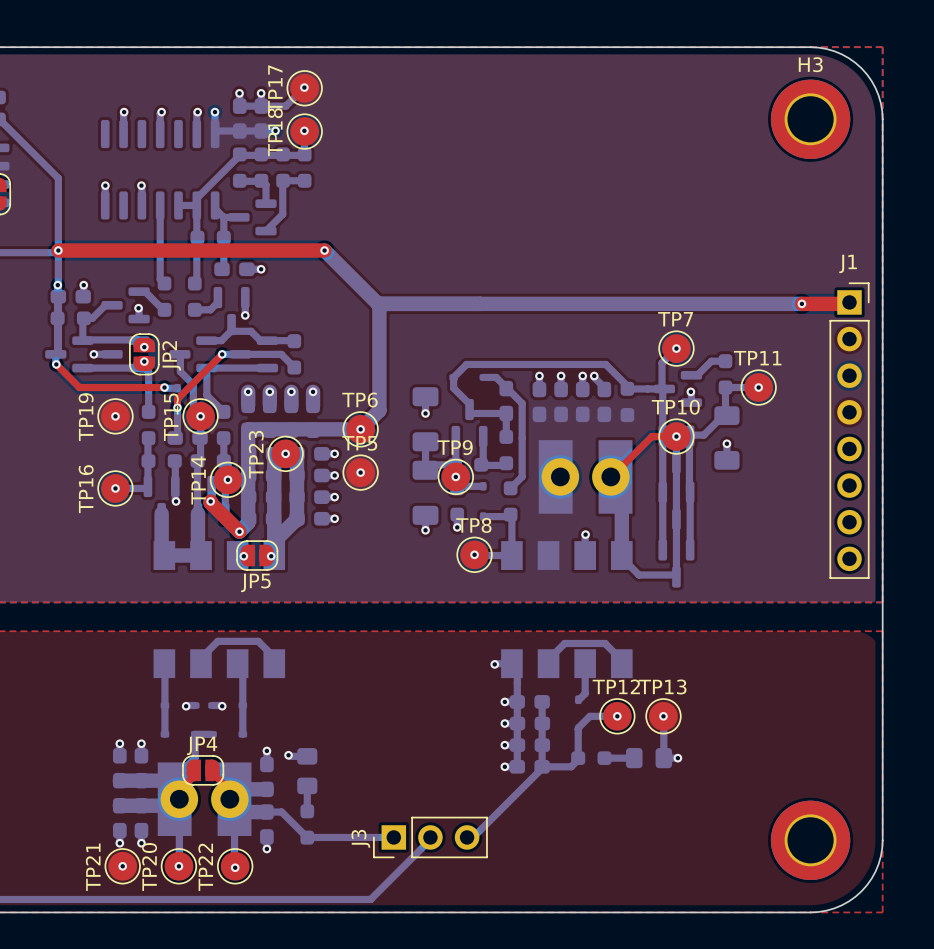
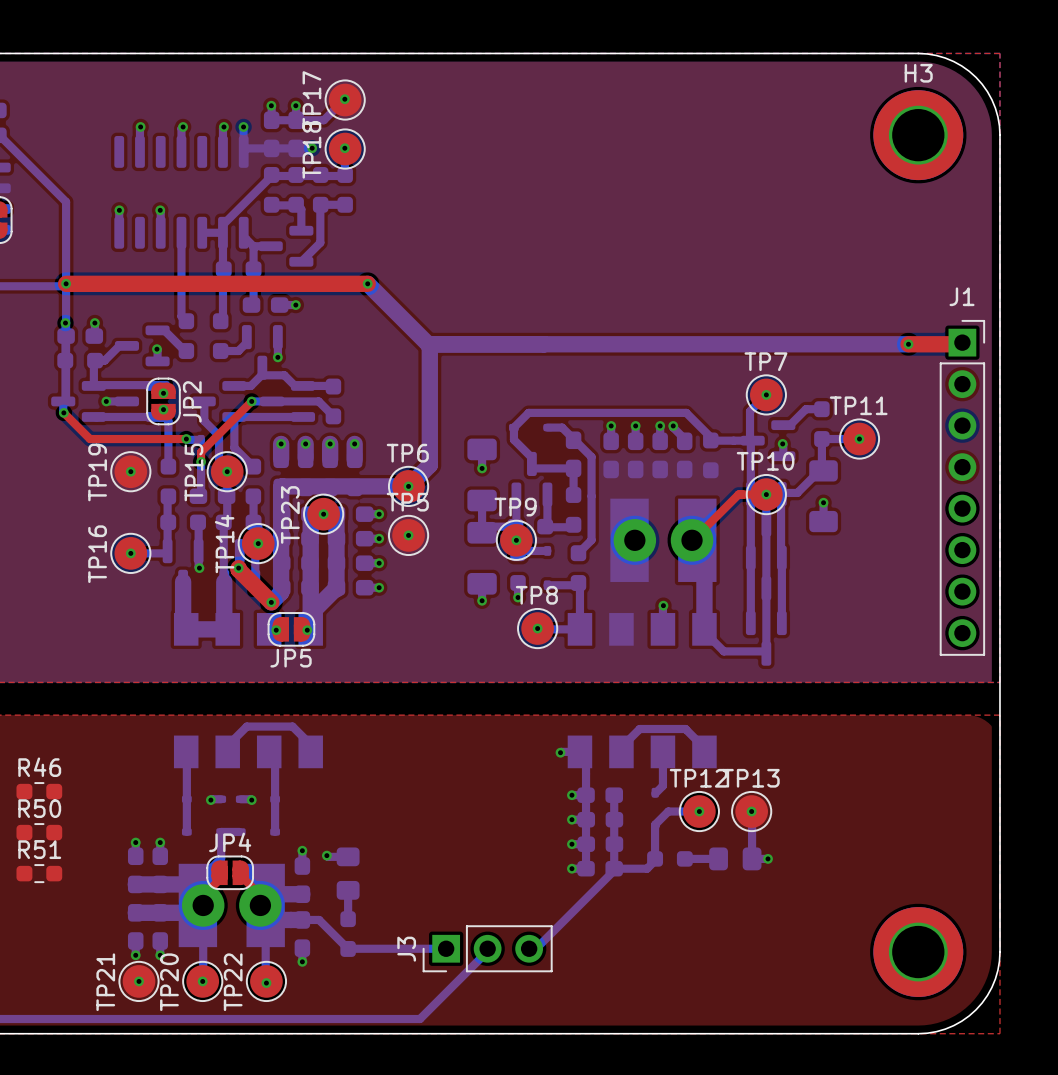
R46: none -> (39, 791)
R50: none -> (39, 832)
R51: none -> (39, 873)

